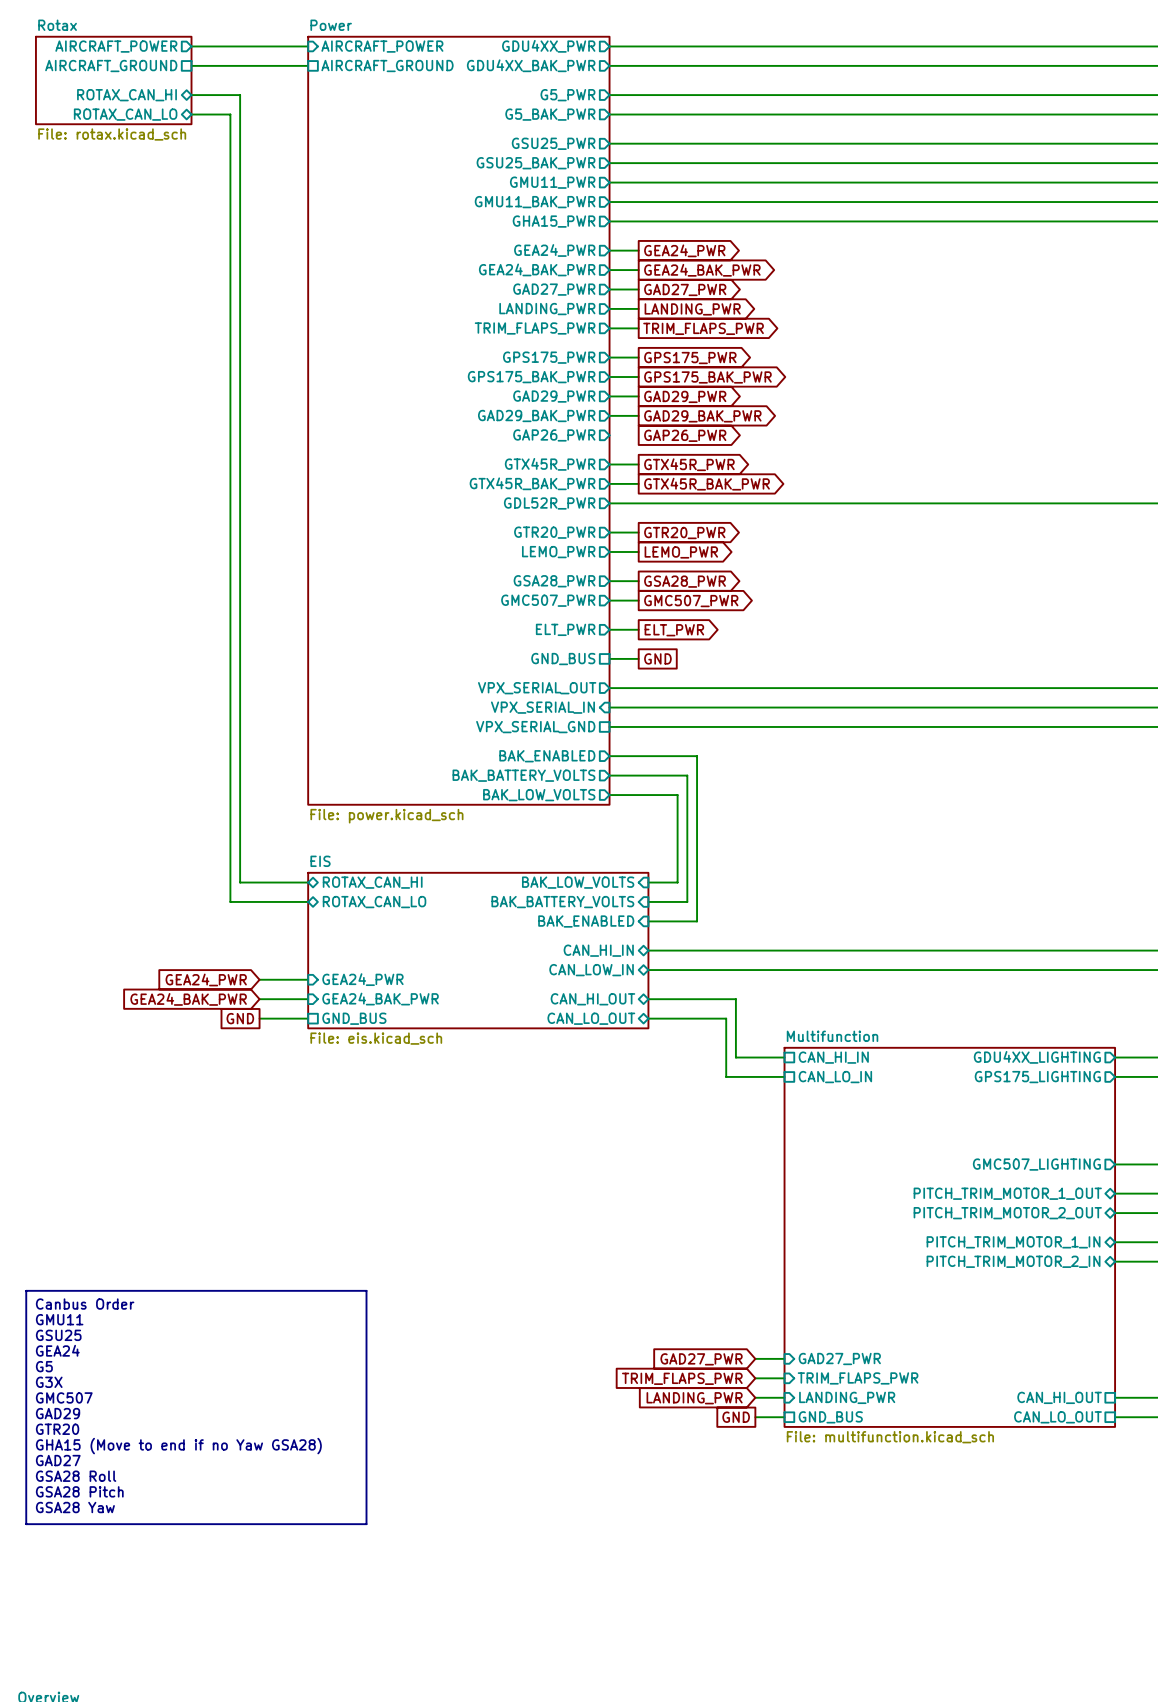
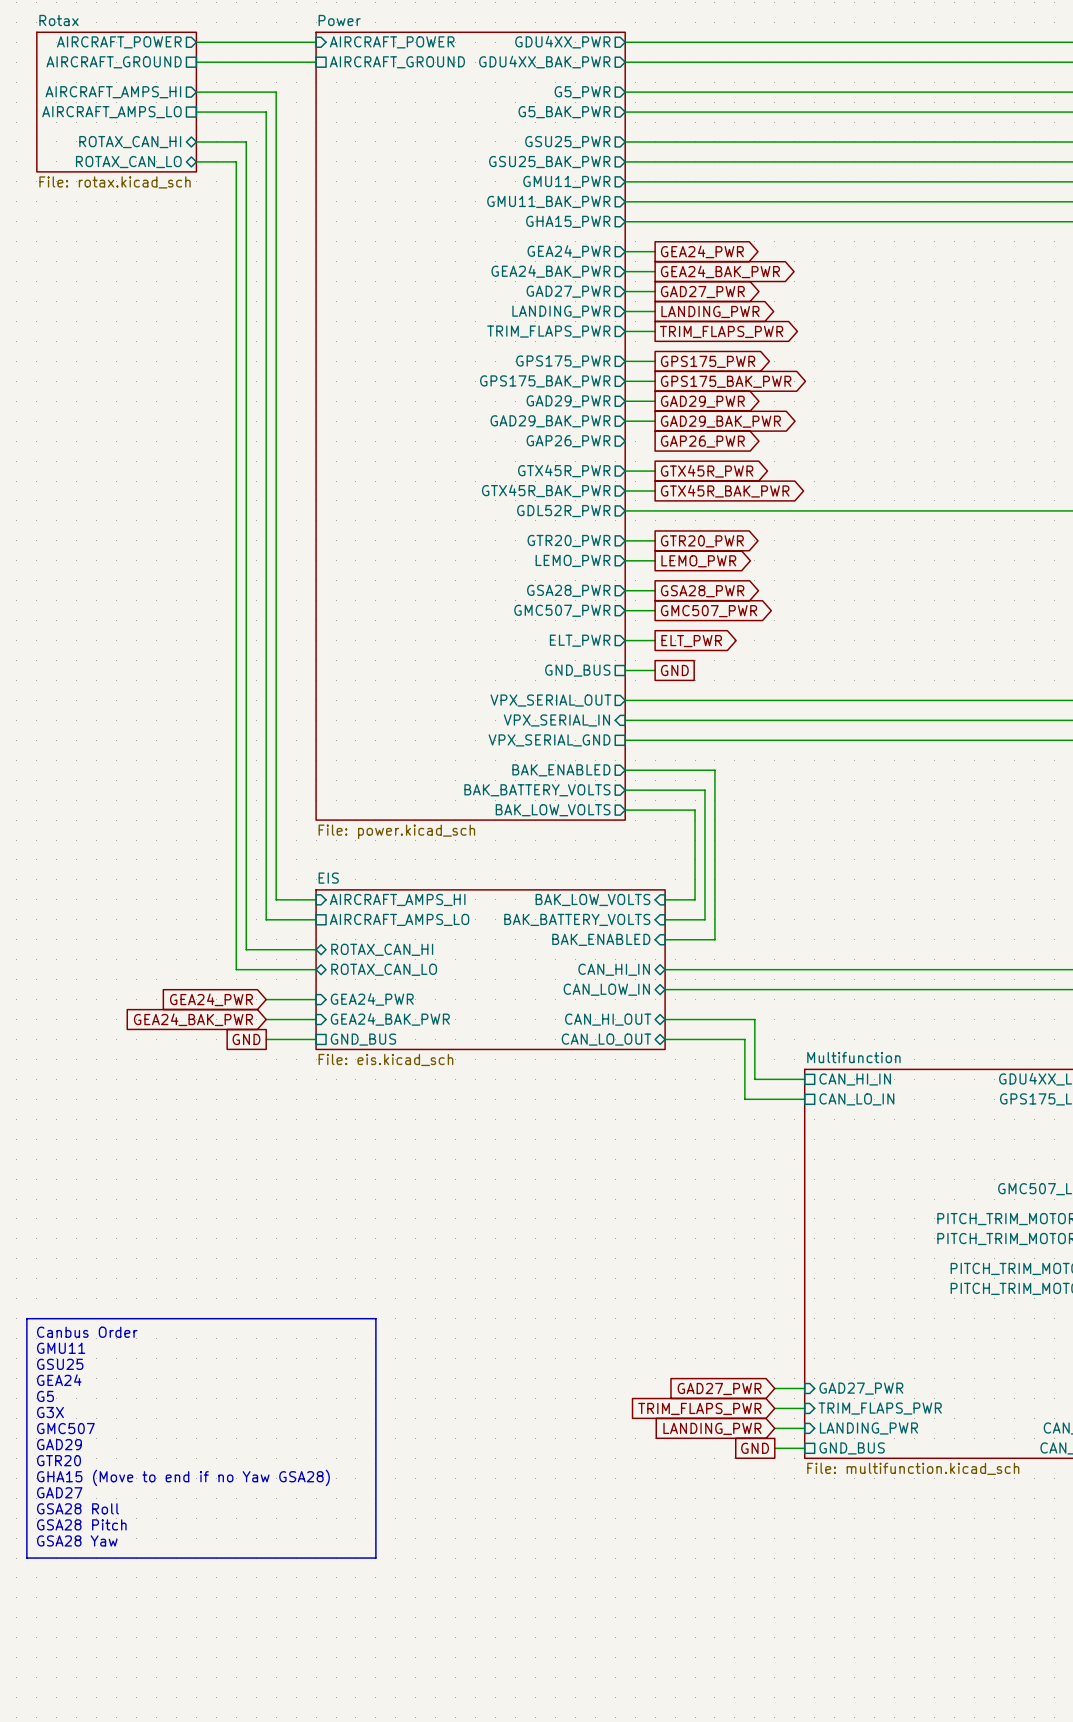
sheet Rotax: File: rotax.kicad_sch (113, 80) -> none
sheet pin shape: bidirectional (127, 95) -> output (113, 92)
sheet pin: ROTAX_CAN_HI (127, 95) -> AIRCRAFT_AMPS_HI (113, 92)
wire: (240, 95) (240, 143) -> (196, 141) (246, 141)
wire: none -> (246, 92) (276, 92) (276, 899)
sheet Rotax: none -> File: rotax.kicad_sch (116, 102)
sheet pin shape: bidirectional (125, 114) -> passive (111, 112)
sheet pin: ROTAX_CAN_LO (125, 114) -> AIRCRAFT_AMPS_LO (111, 112)
wire: (230, 114) (230, 163) -> (196, 161) (236, 161)
wire: none -> (236, 112) (266, 112) (266, 919)
sheet pin: none -> ROTAX_CAN_HI (130, 142)
sheet pin: none -> ROTAX_CAN_LO (128, 162)
wire: (240, 882) (269, 882) -> (246, 899) (246, 949) (316, 949)
sheet pin shape: bidirectional (372, 882) -> input (397, 899)
sheet pin: ROTAX_CAN_HI (372, 882) -> AIRCRAFT_AMPS_HI (397, 899)
wire: (230, 901) (259, 901) -> (236, 919) (236, 969) (316, 969)
sheet pin shape: bidirectional (374, 902) -> passive (399, 919)
sheet pin: ROTAX_CAN_LO (374, 902) -> AIRCRAFT_AMPS_LO (399, 919)
sheet pin: none -> ROTAX_CAN_HI (382, 949)
sheet pin: none -> ROTAX_CAN_LO (384, 969)

